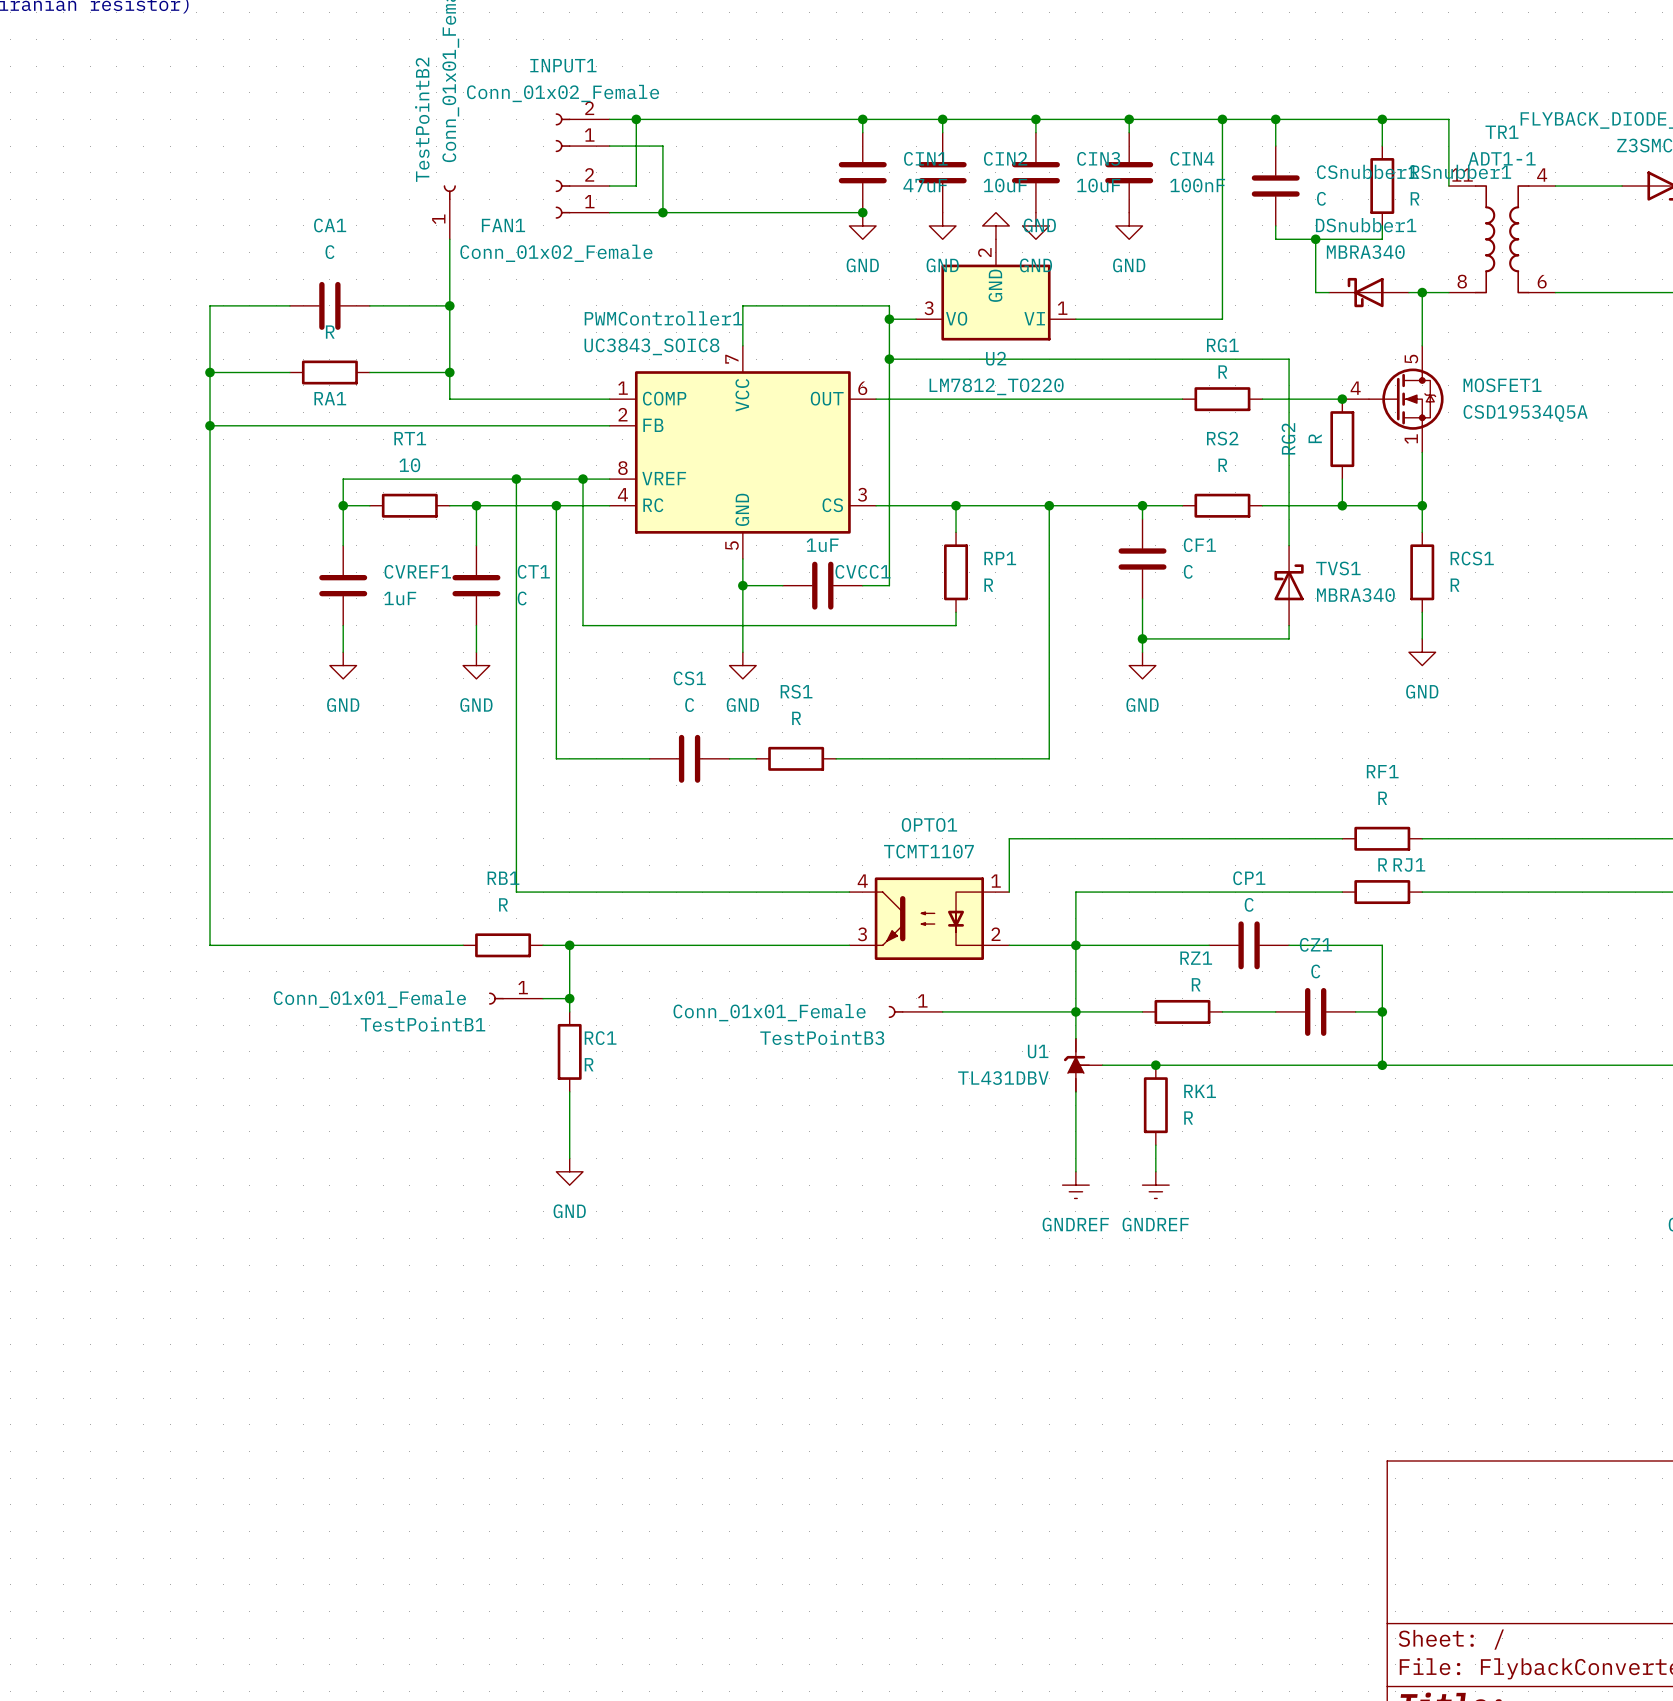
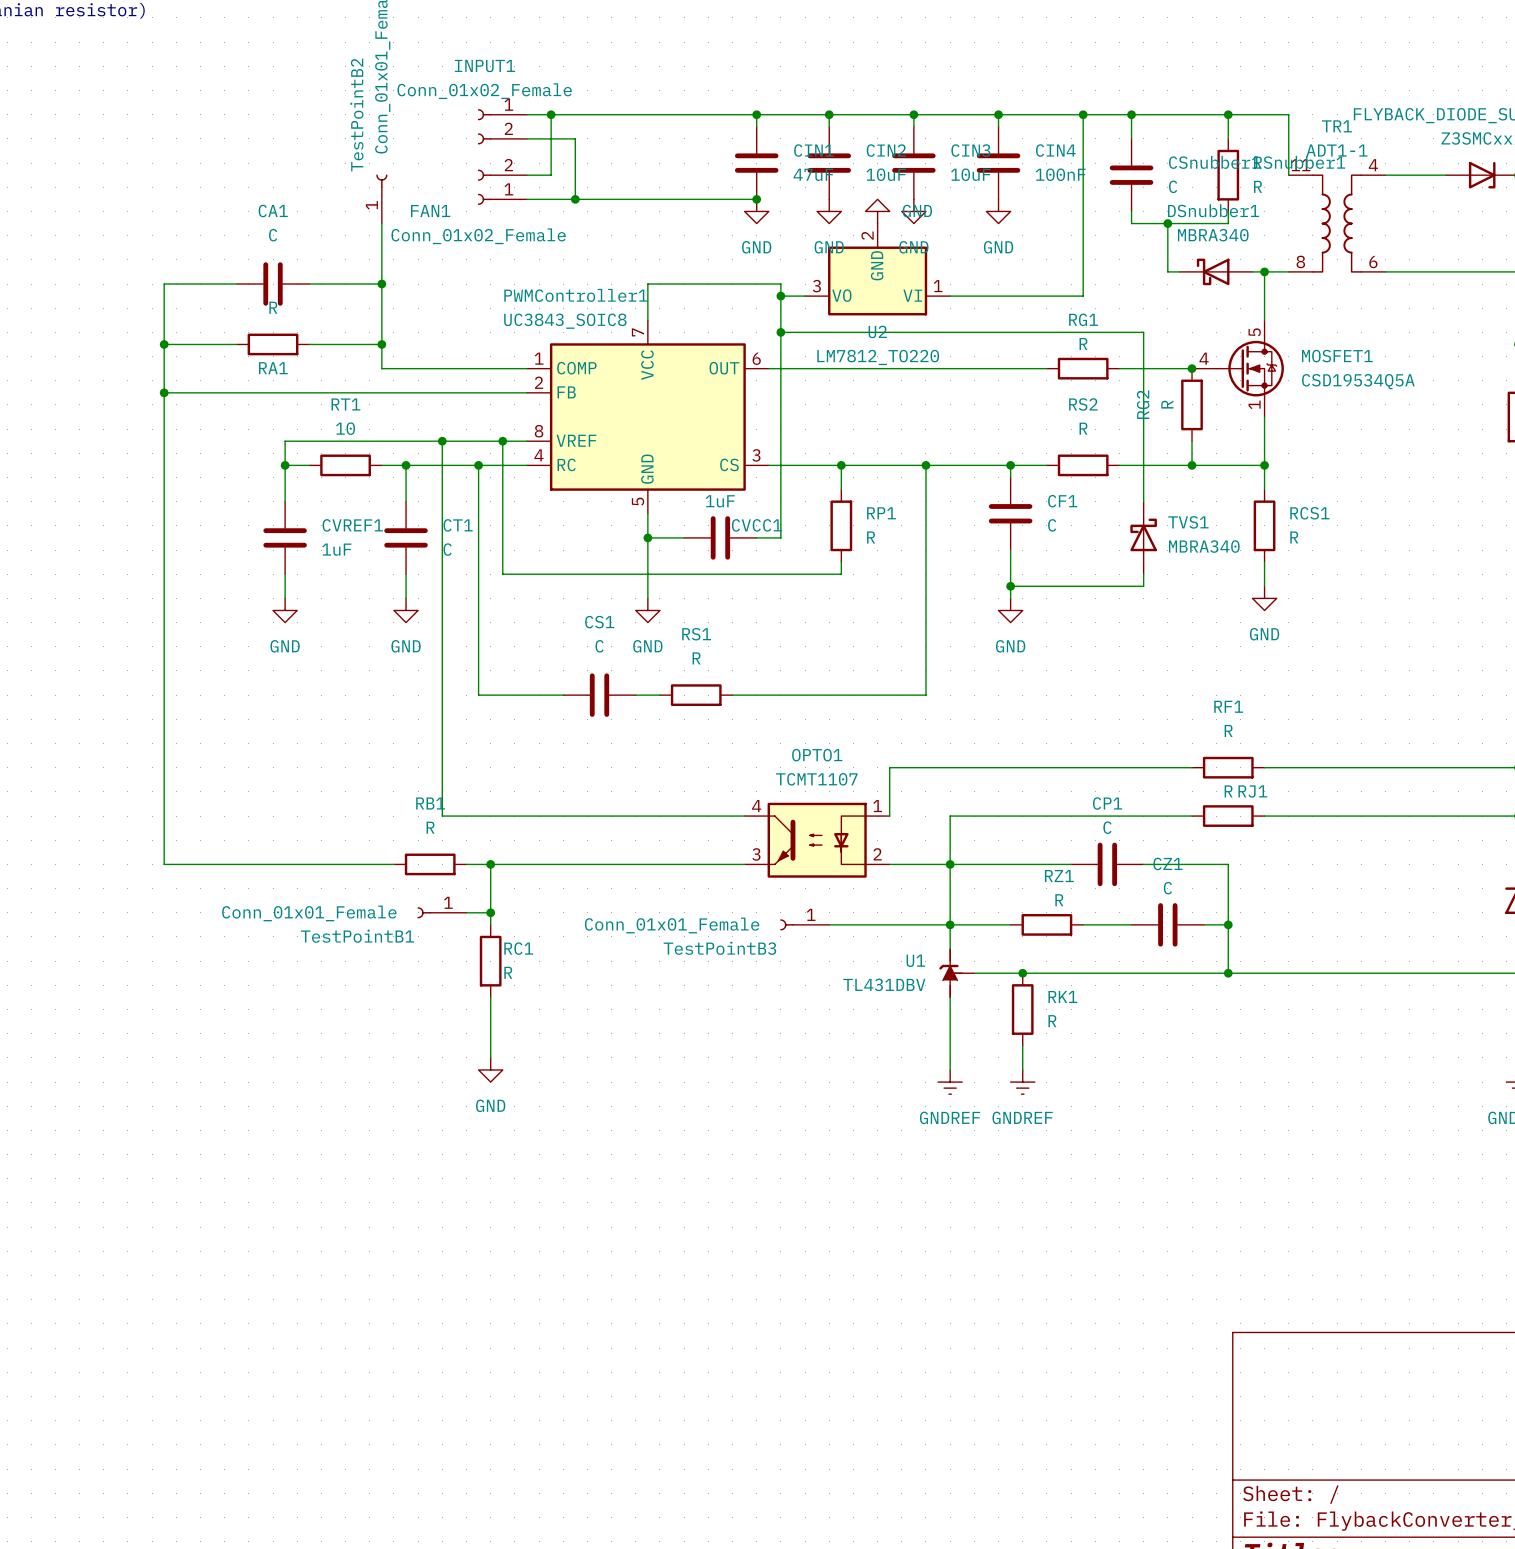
INPUT1 flip: as is (563, 132) -> up-down (484, 126)

